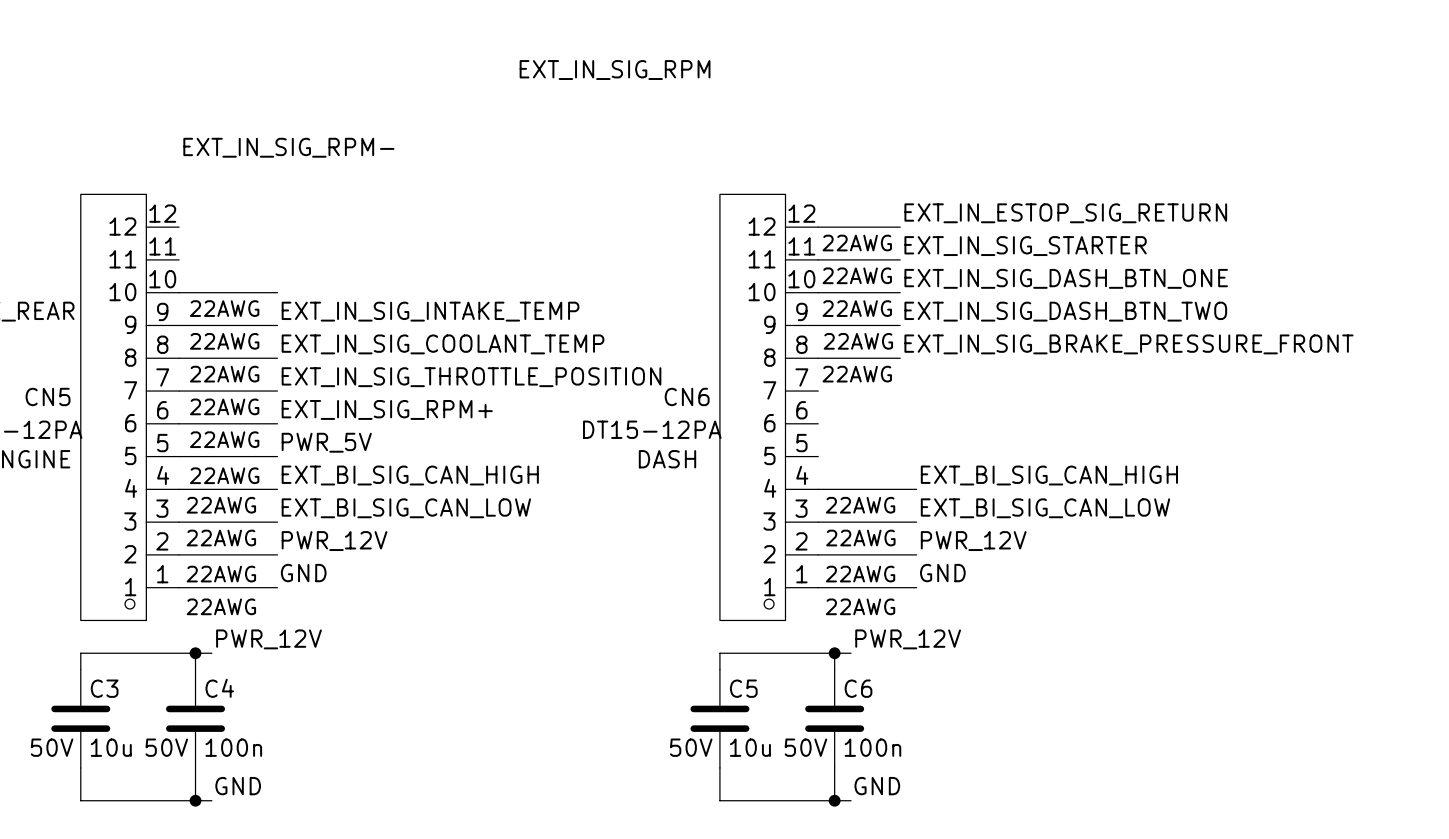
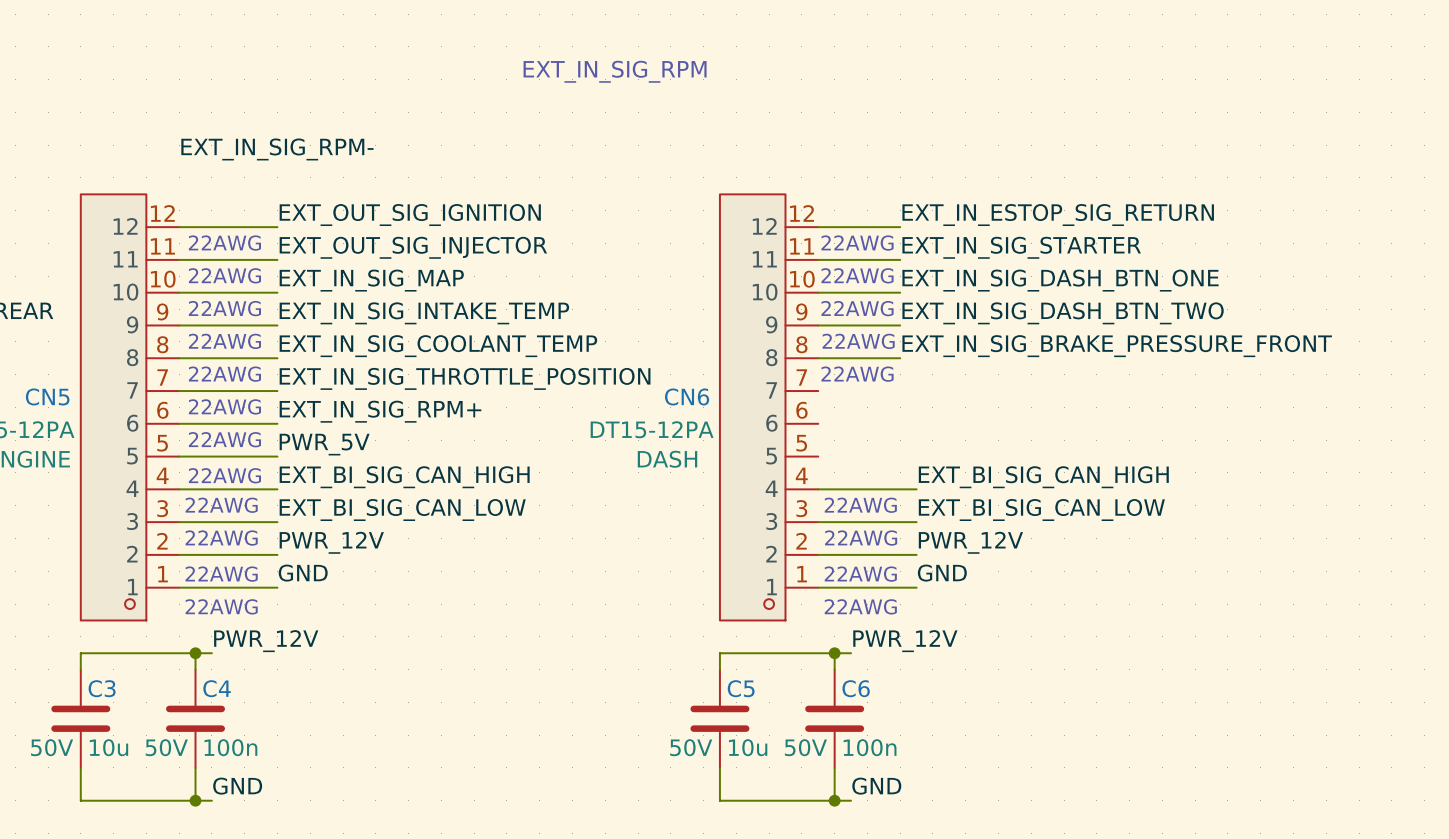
label: none -> EXT_OUT_SIG_IGNITION (410, 215)
wire: none -> (179, 227) (277, 227)
text: none -> 22AWG (224, 243)
label: none -> EXT_OUT_SIG_INJECTOR (413, 247)
wire: none -> (179, 259) (277, 259)
text: none -> 22AWG (224, 275)
label: none -> EXT_IN_SIG_MAP (371, 280)

